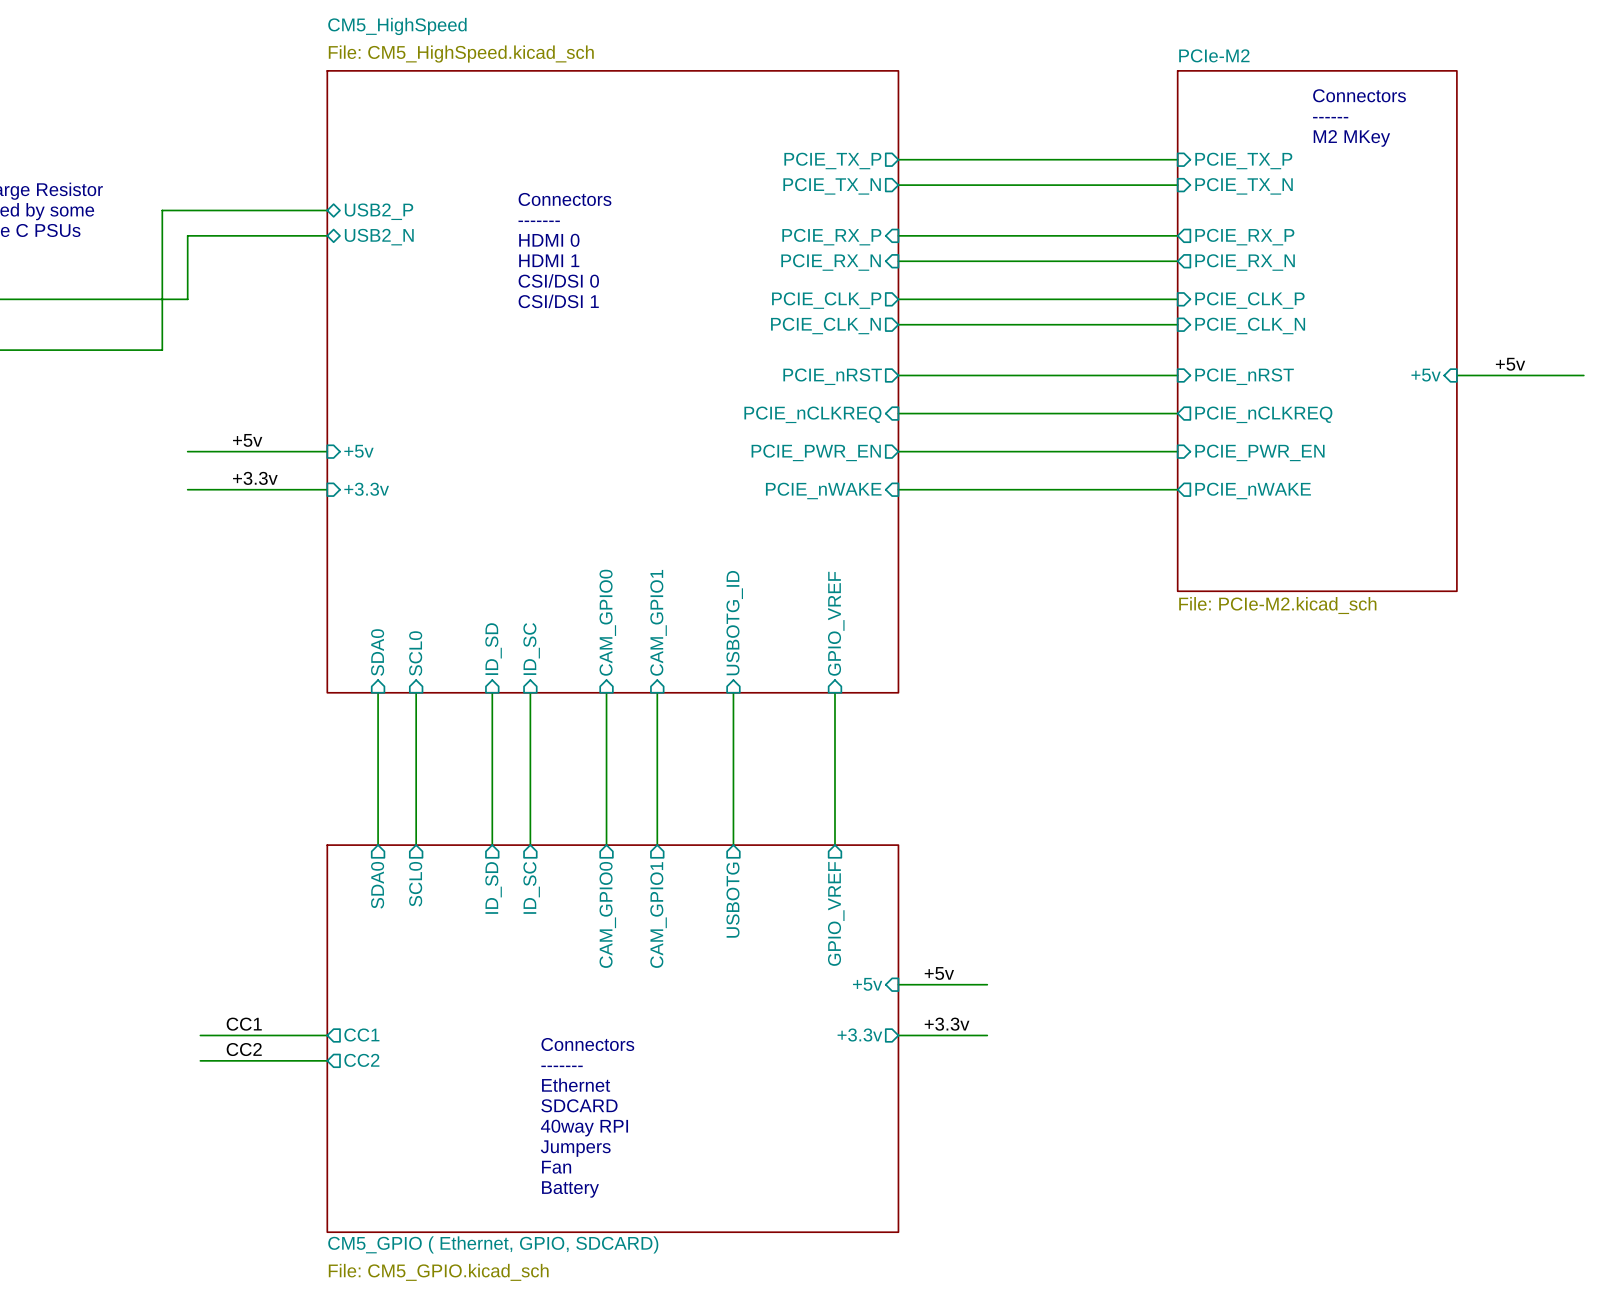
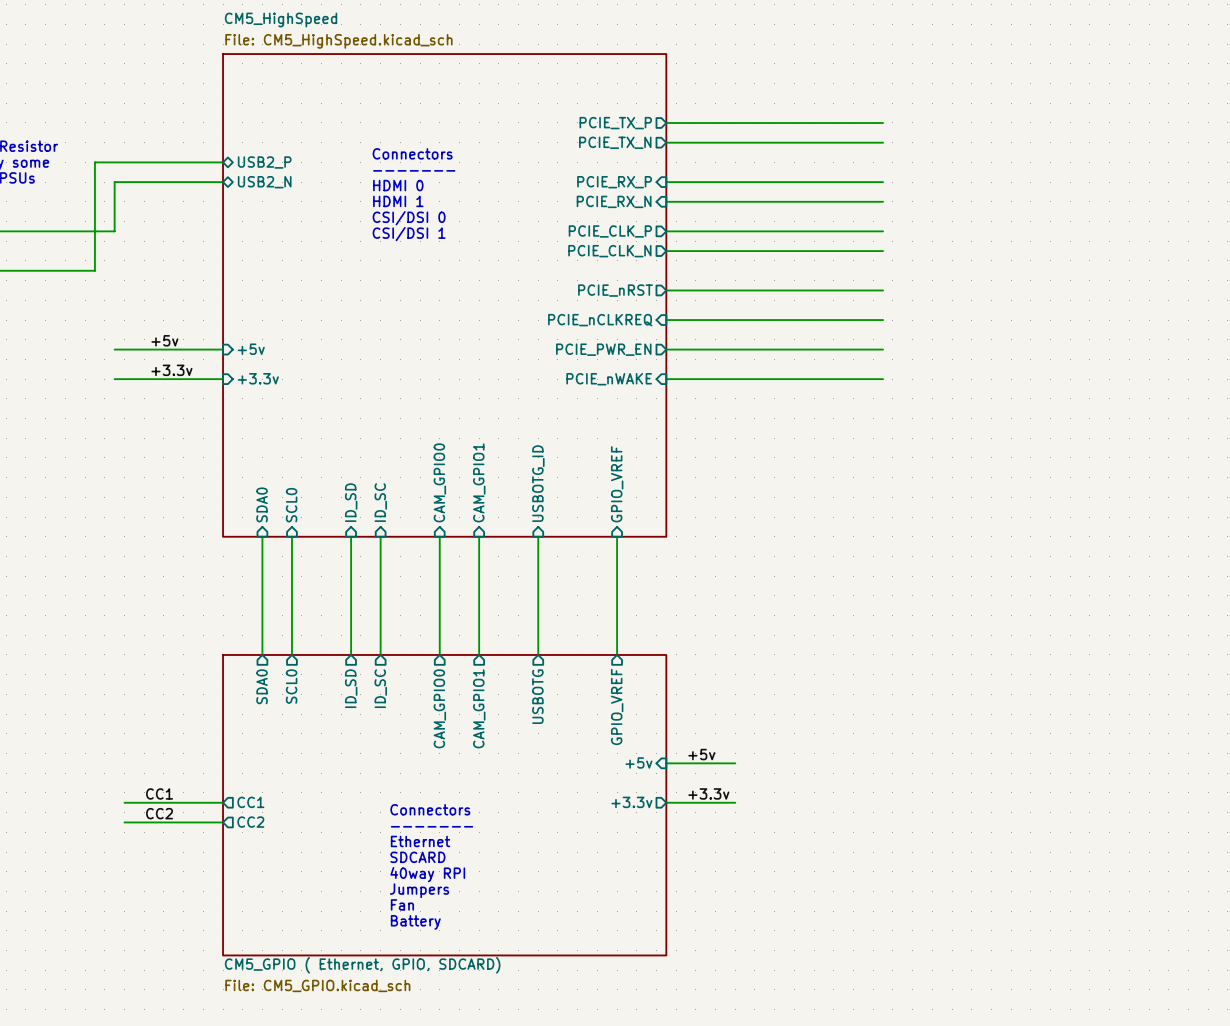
text: Connectors (1359, 95) -> none
text: ------ (1330, 117) -> none
text: M2 MKey (1351, 138) -> none
sheet pin: PCIE_TX_P (1243, 160) -> none
sheet pin: PCIE_TX_N (1244, 186) -> none
sheet pin: PCIE_RX_P (1244, 237) -> none
sheet pin: PCIE_RX_N (1245, 262) -> none
sheet pin: PCIE_CLK_P (1249, 300) -> none
sheet pin: PCIE_CLK_N (1250, 325) -> none
sheet PCIe-M2: File: PCIe-M2.kicad_sch (1317, 331) -> none
label: +5v (1510, 364) -> none
sheet pin: +5v (1426, 375) -> none
wire: (1456, 375) (1583, 375) -> none
sheet pin: PCIE_nRST (1244, 376) -> none
sheet pin: PCIE_nCLKREQ (1263, 414) -> none
sheet pin: PCIE_PWR_EN (1259, 452) -> none
sheet pin: PCIE_nWAKE (1253, 490) -> none

